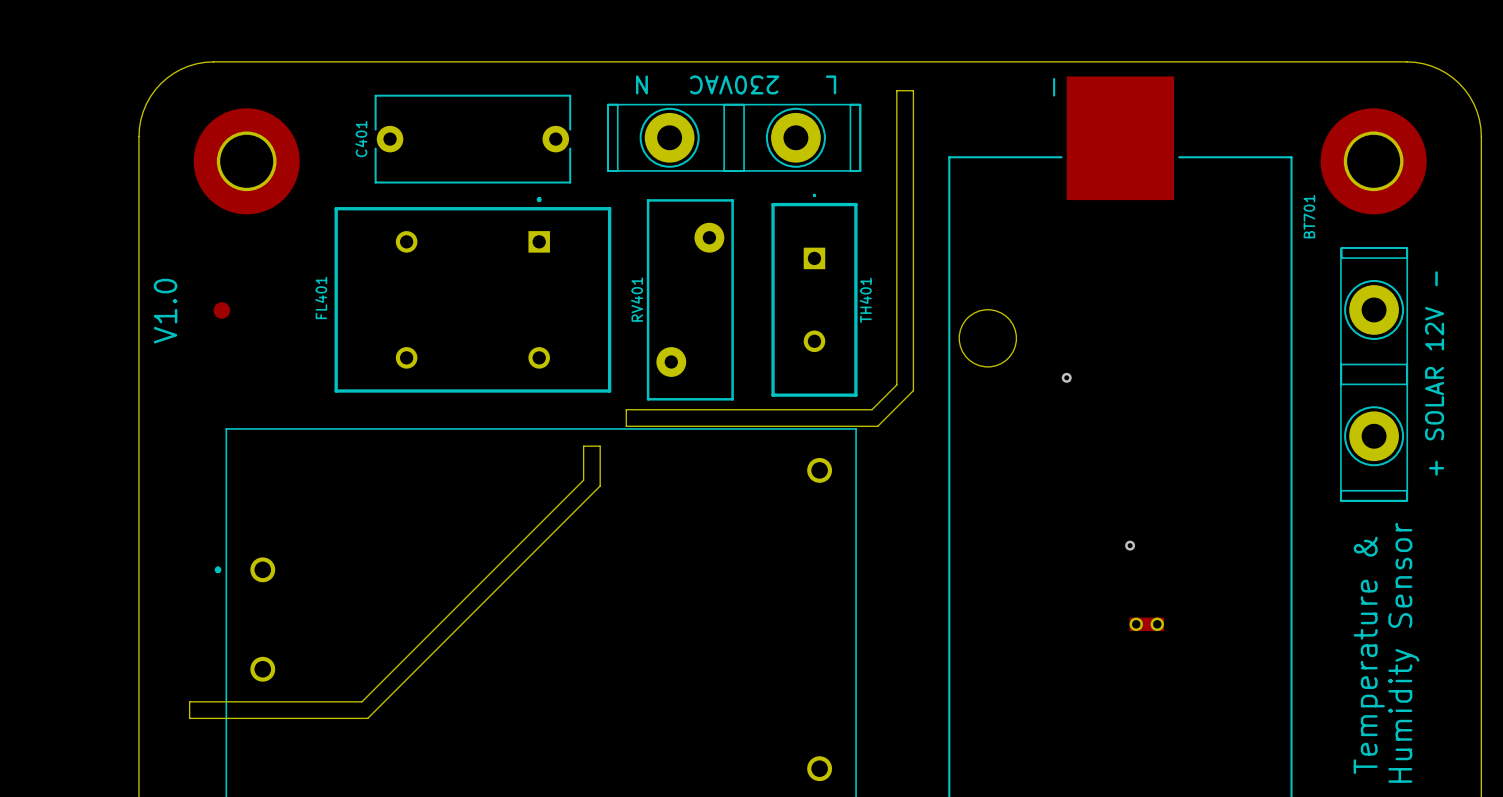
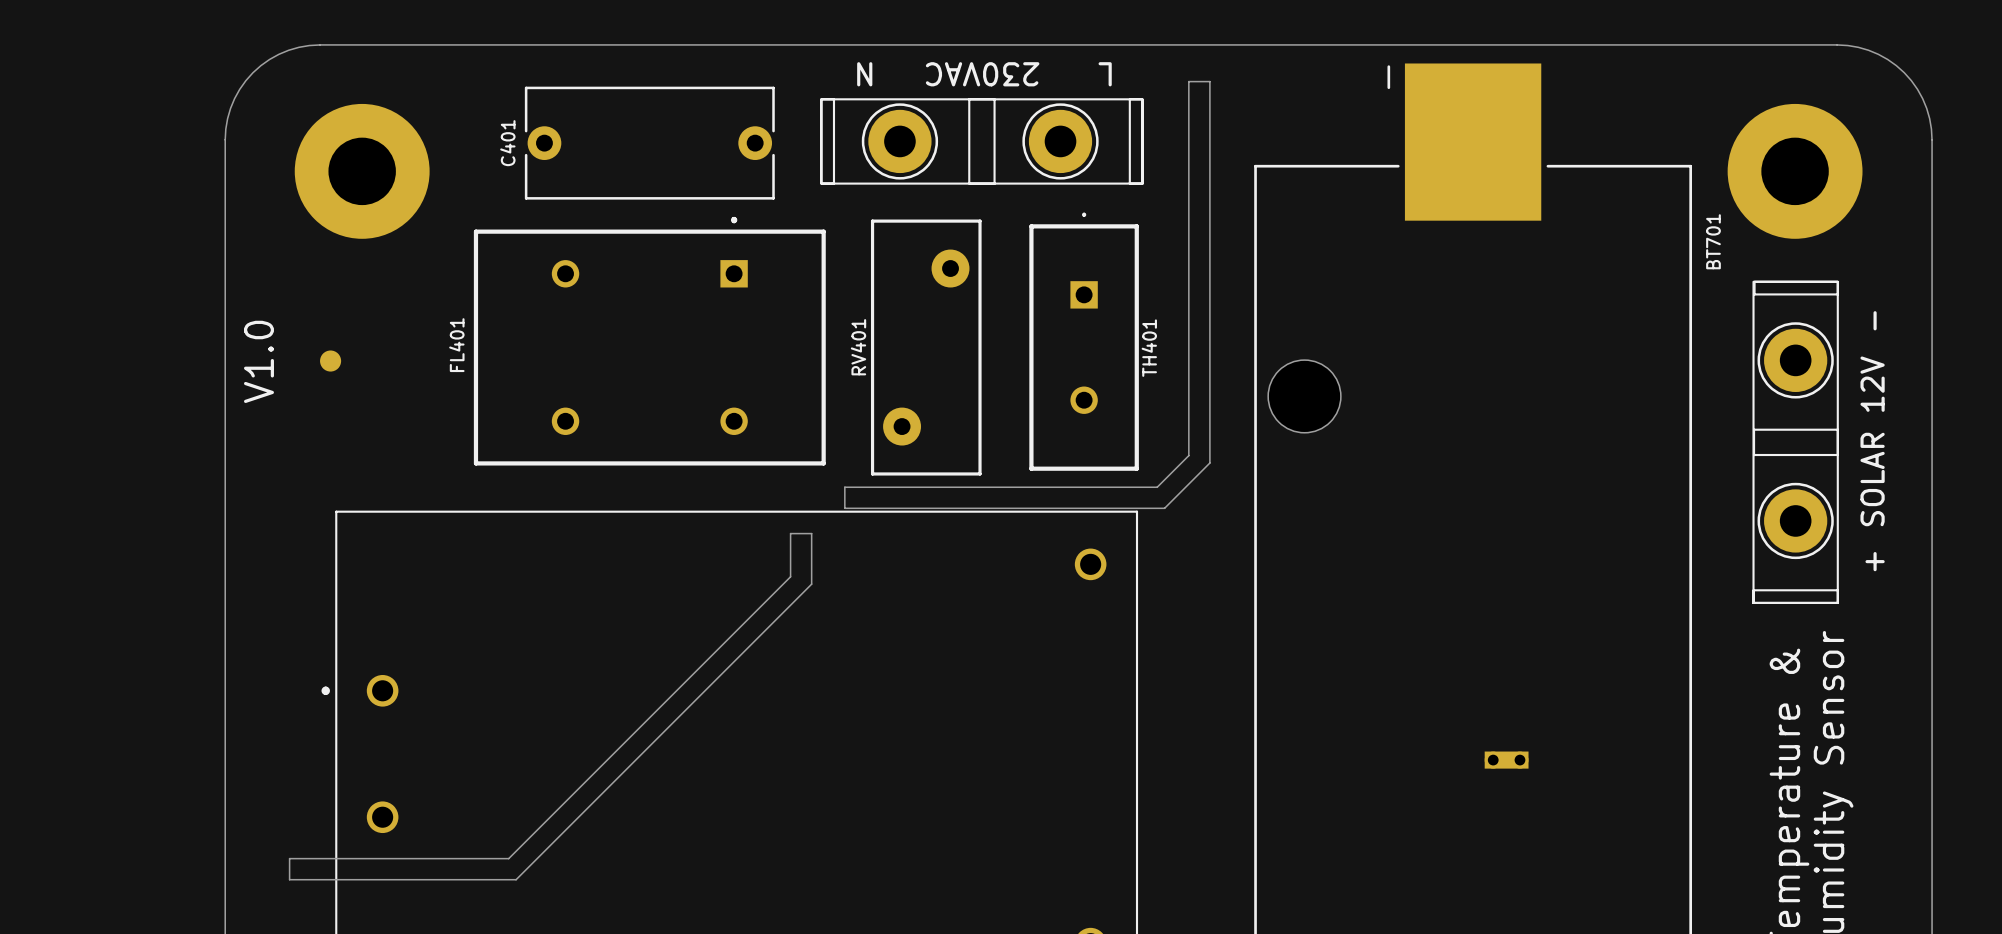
via: (1066, 377) -> none
via: (1130, 545) -> none

